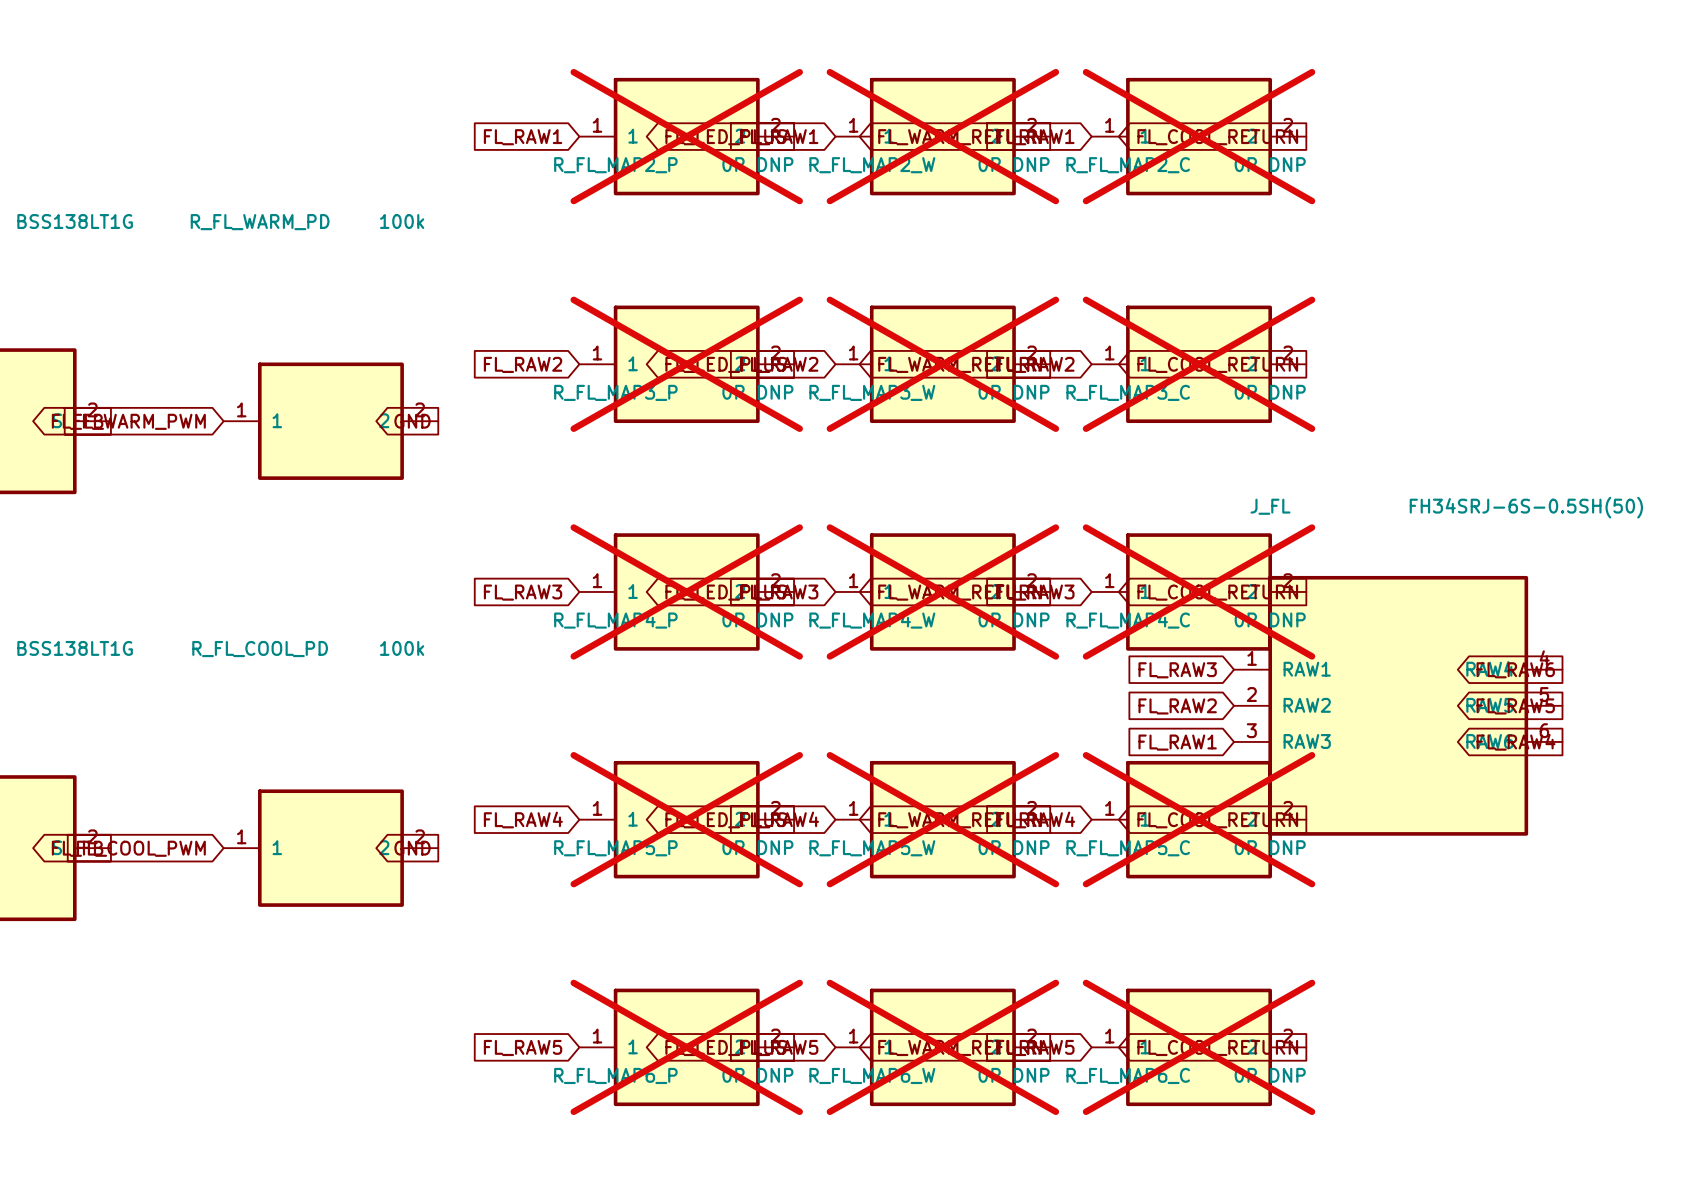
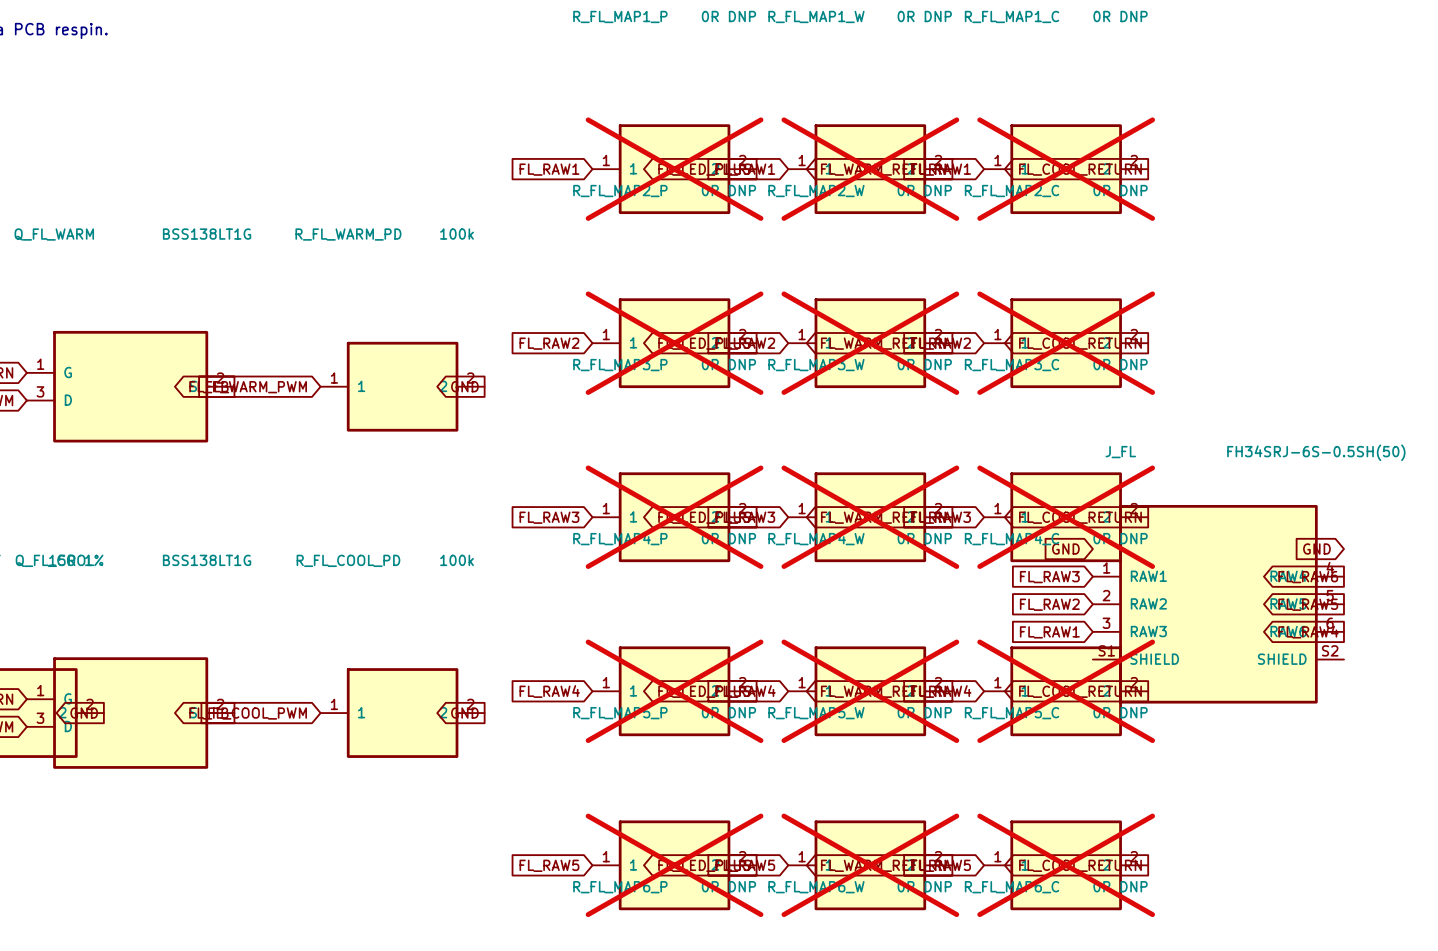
J_FL symbol: [1234, 575, 1563, 836] -> [1092, 504, 1344, 704]
global label: none -> GND (1065, 549)
global label: none -> GND (1316, 549)

